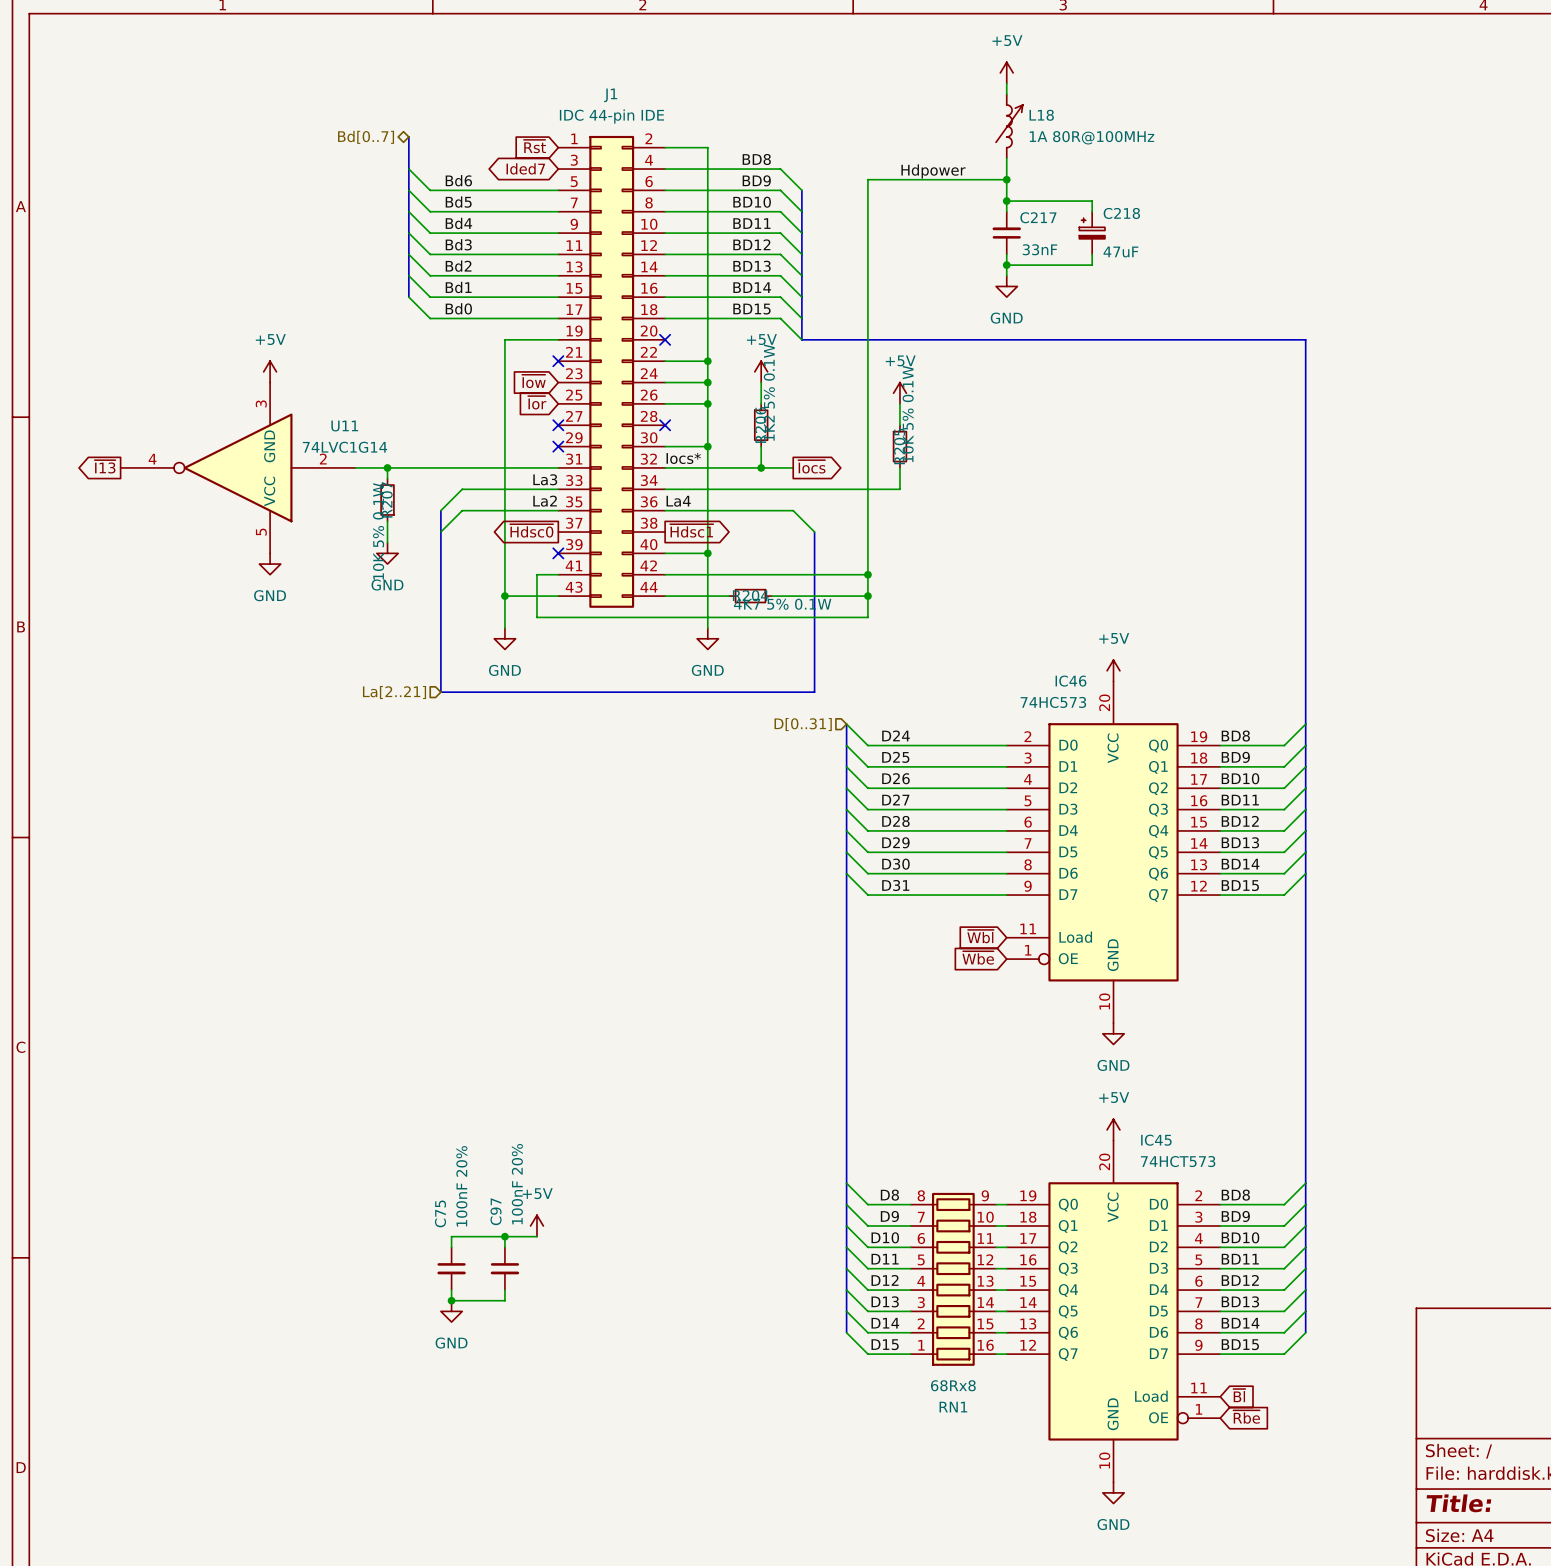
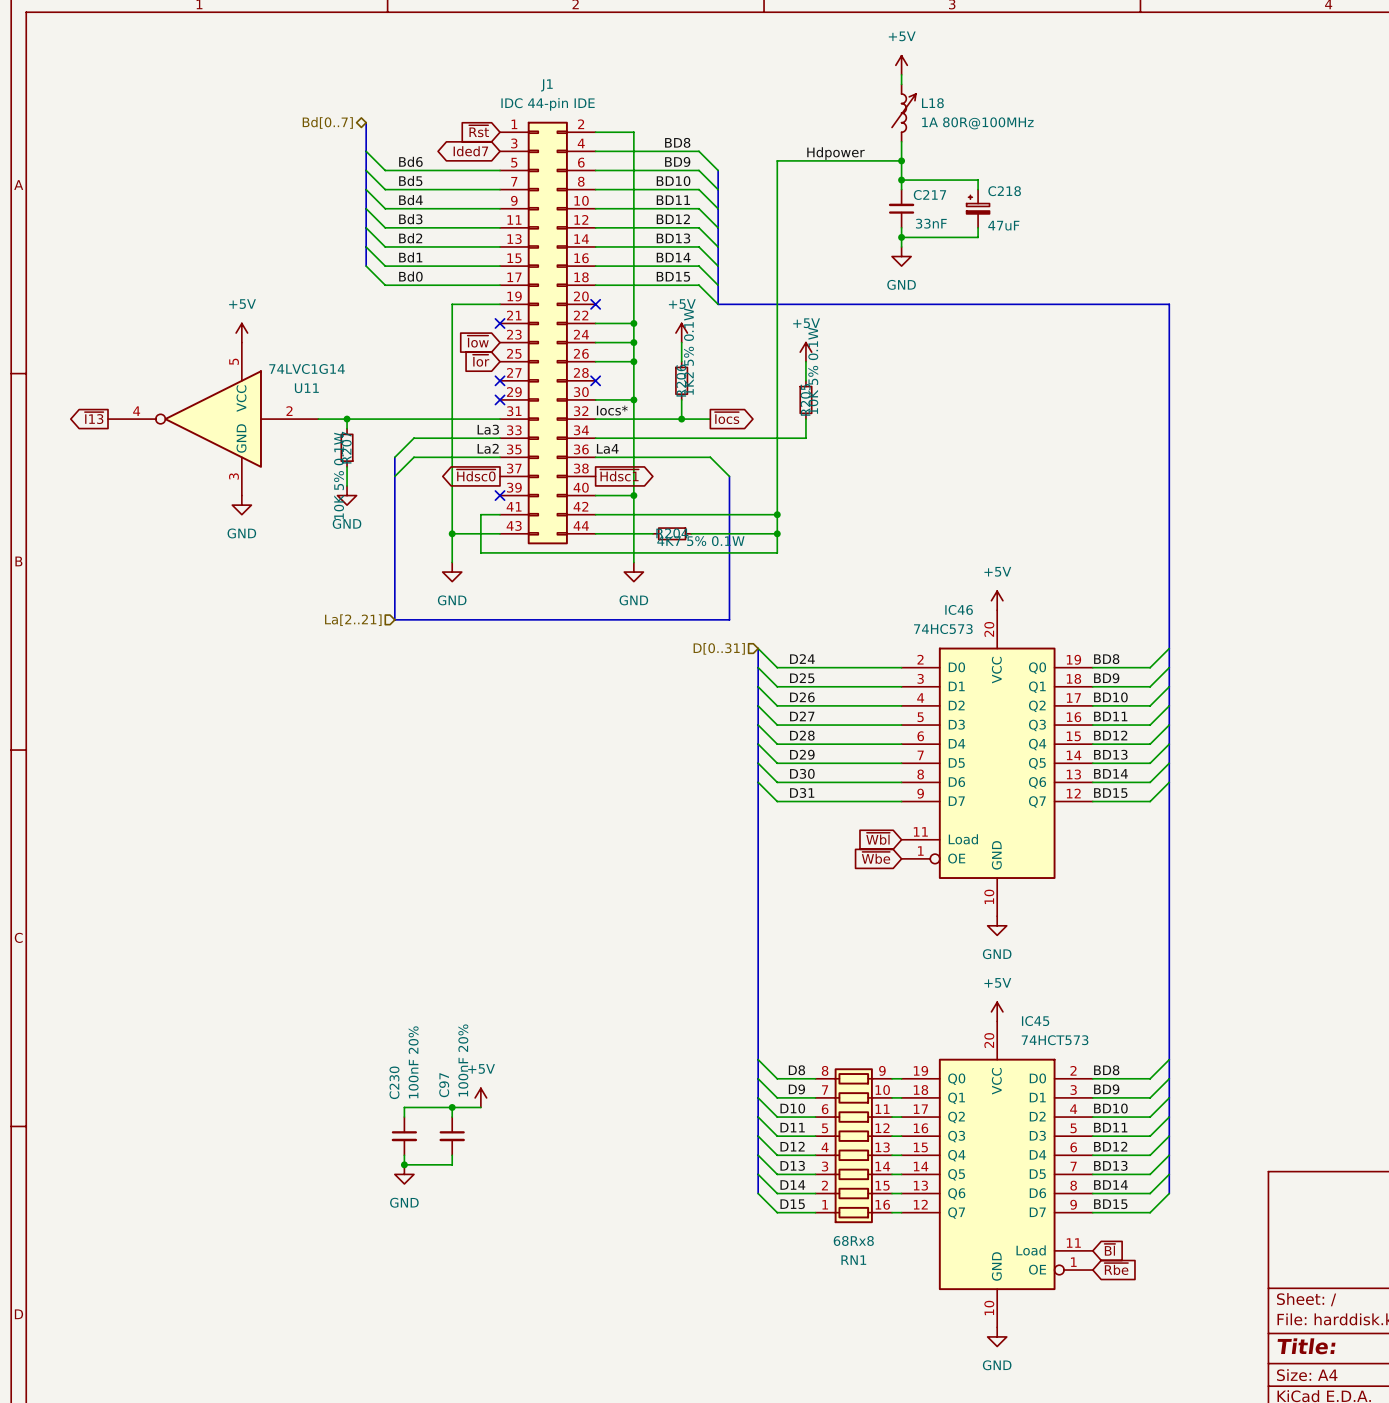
U11 value position: 74LVC1G14 (345, 447) -> 74LVC1G14 (307, 369)
U11 flip: as is (238, 467) -> up-down (213, 419)
C75 name: C75 (440, 1213) -> C230 (394, 1082)

